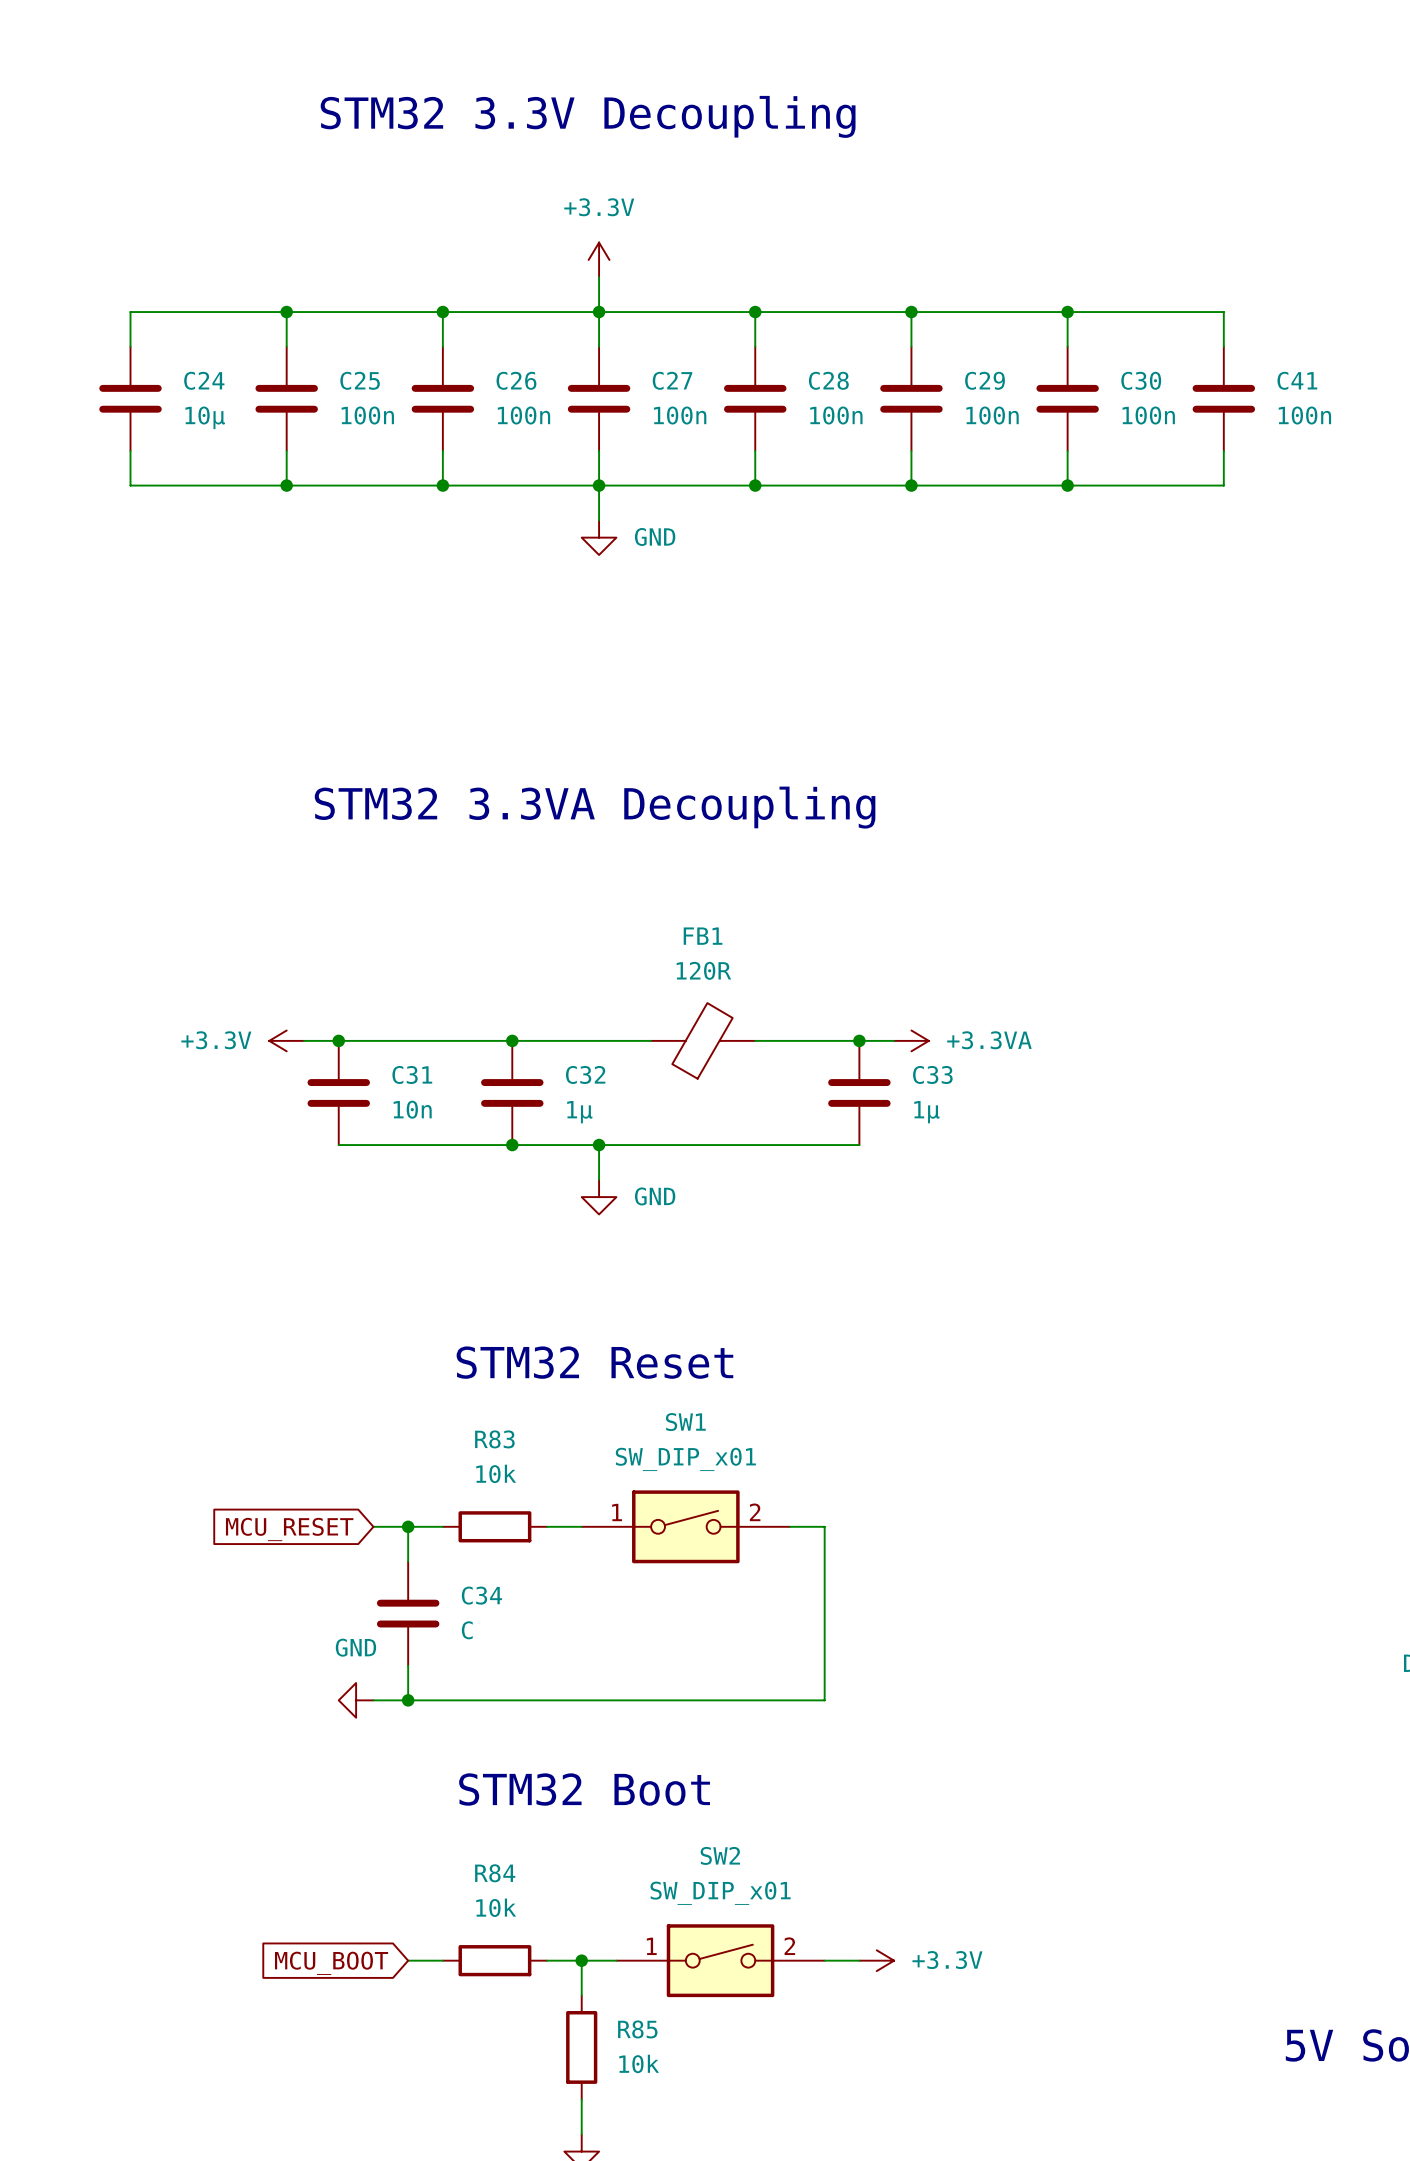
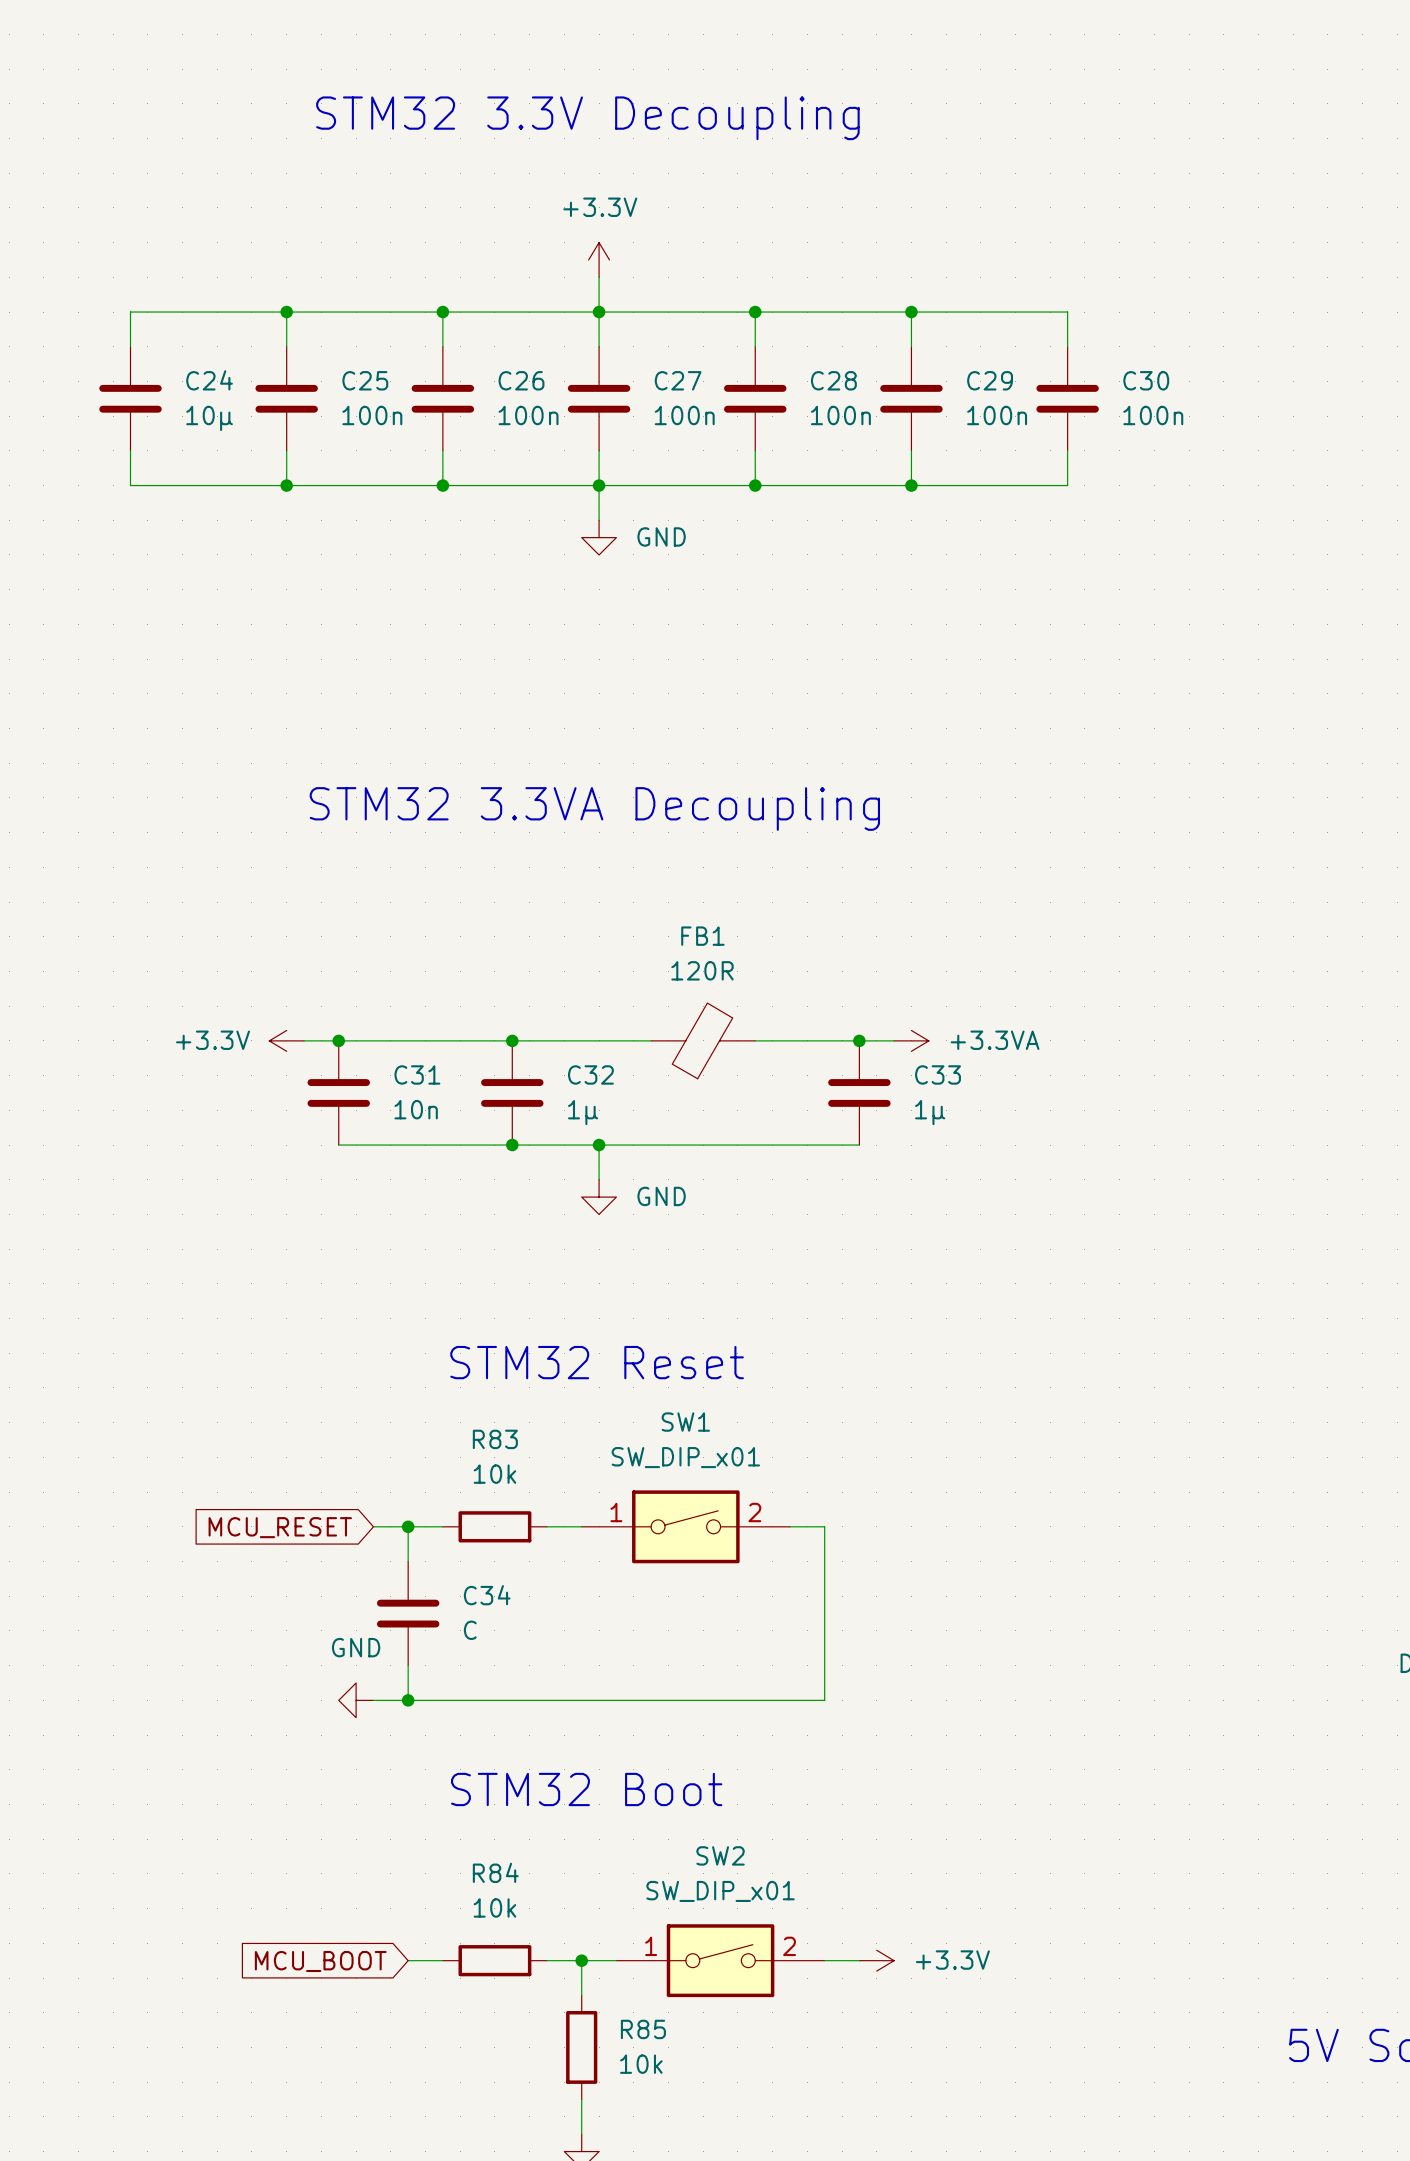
wire: (1067, 312) (1223, 312) (1223, 346) -> none
junction: (1067, 312) -> none
C41: 100n (1223, 398) -> none
wire: (1223, 450) (1223, 485) (1067, 485) -> none
junction: (1067, 485) -> none

